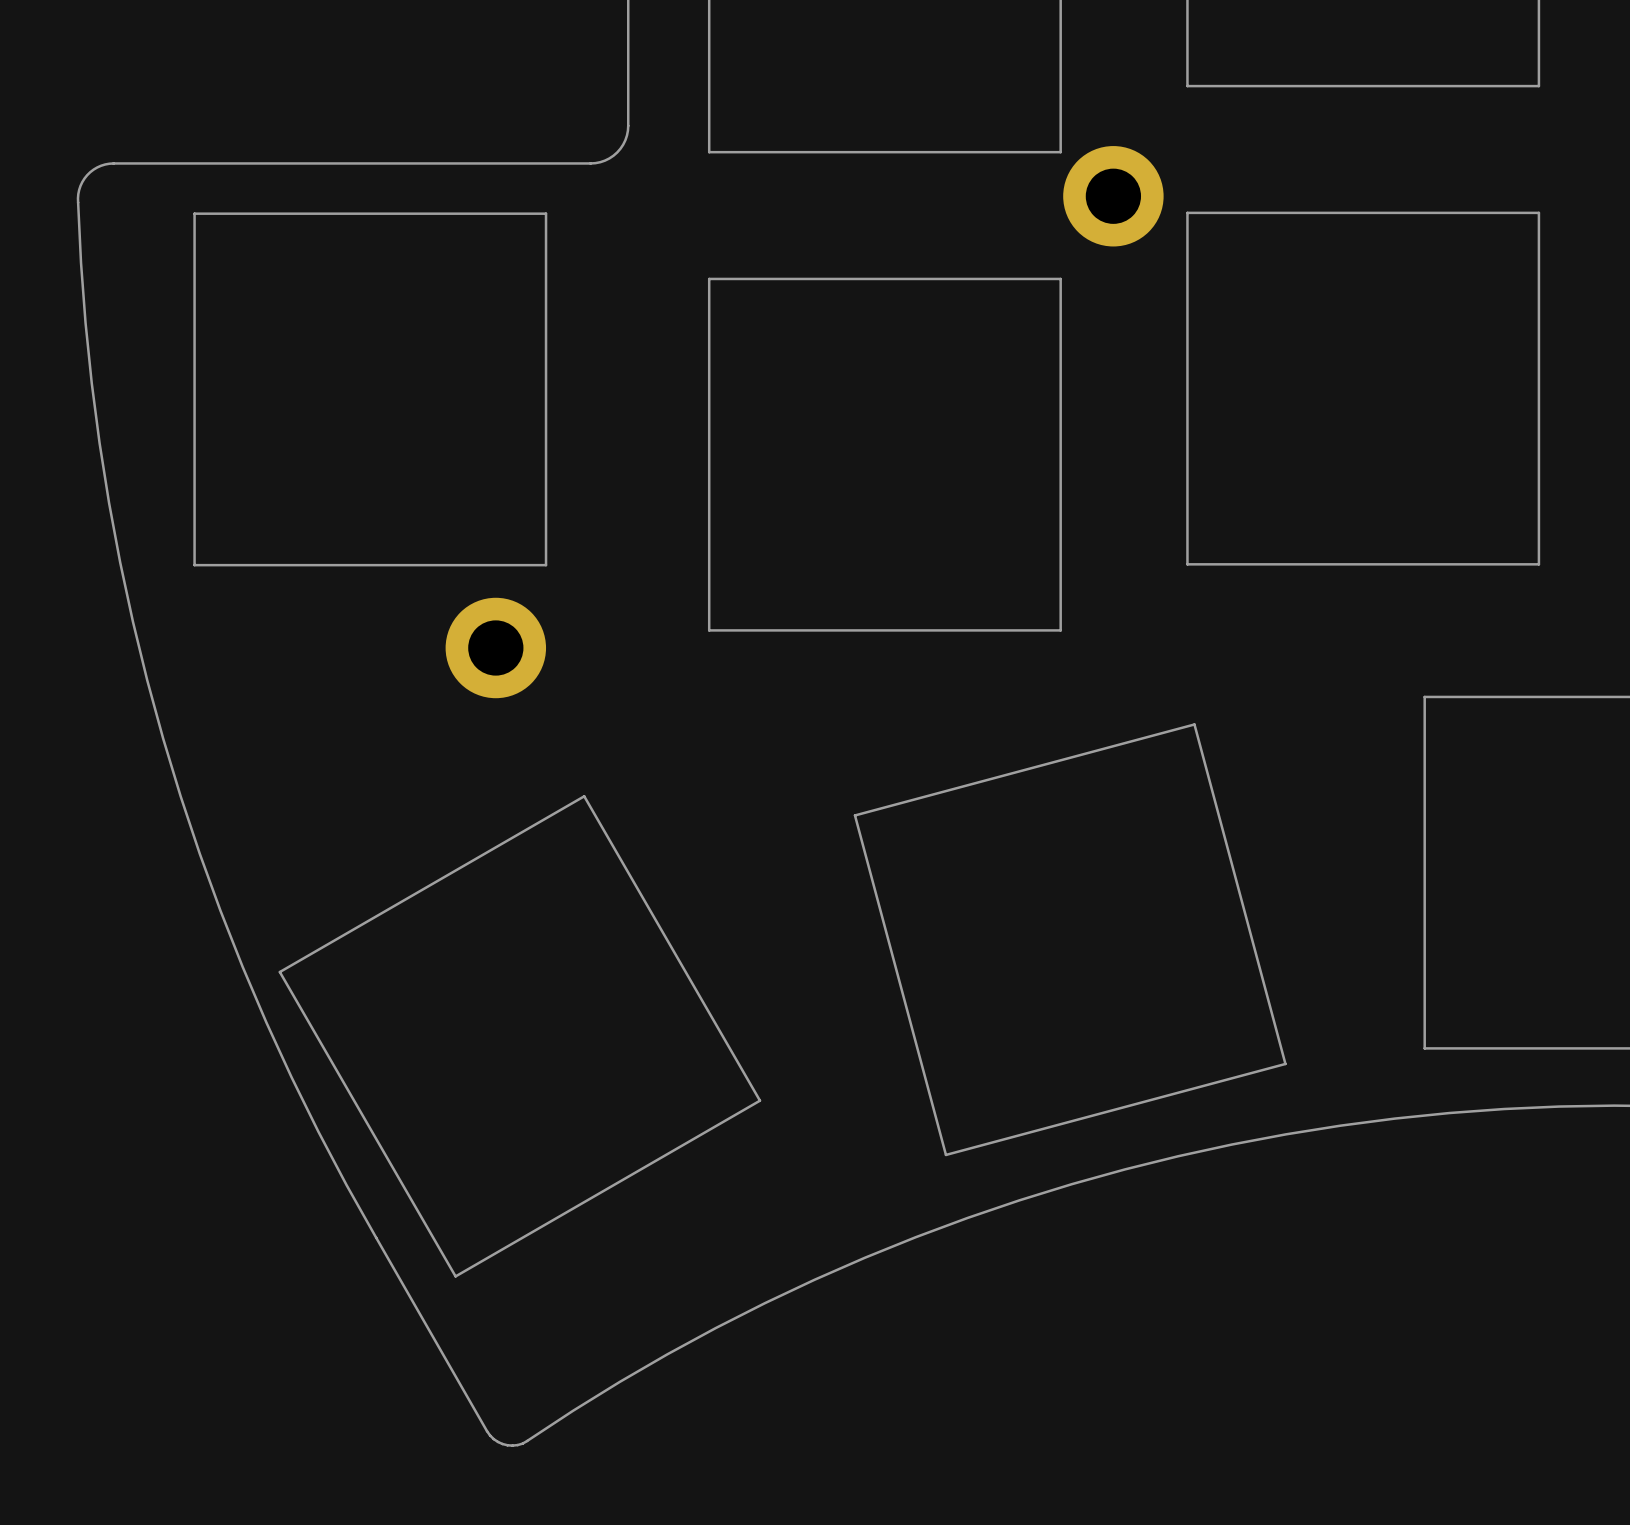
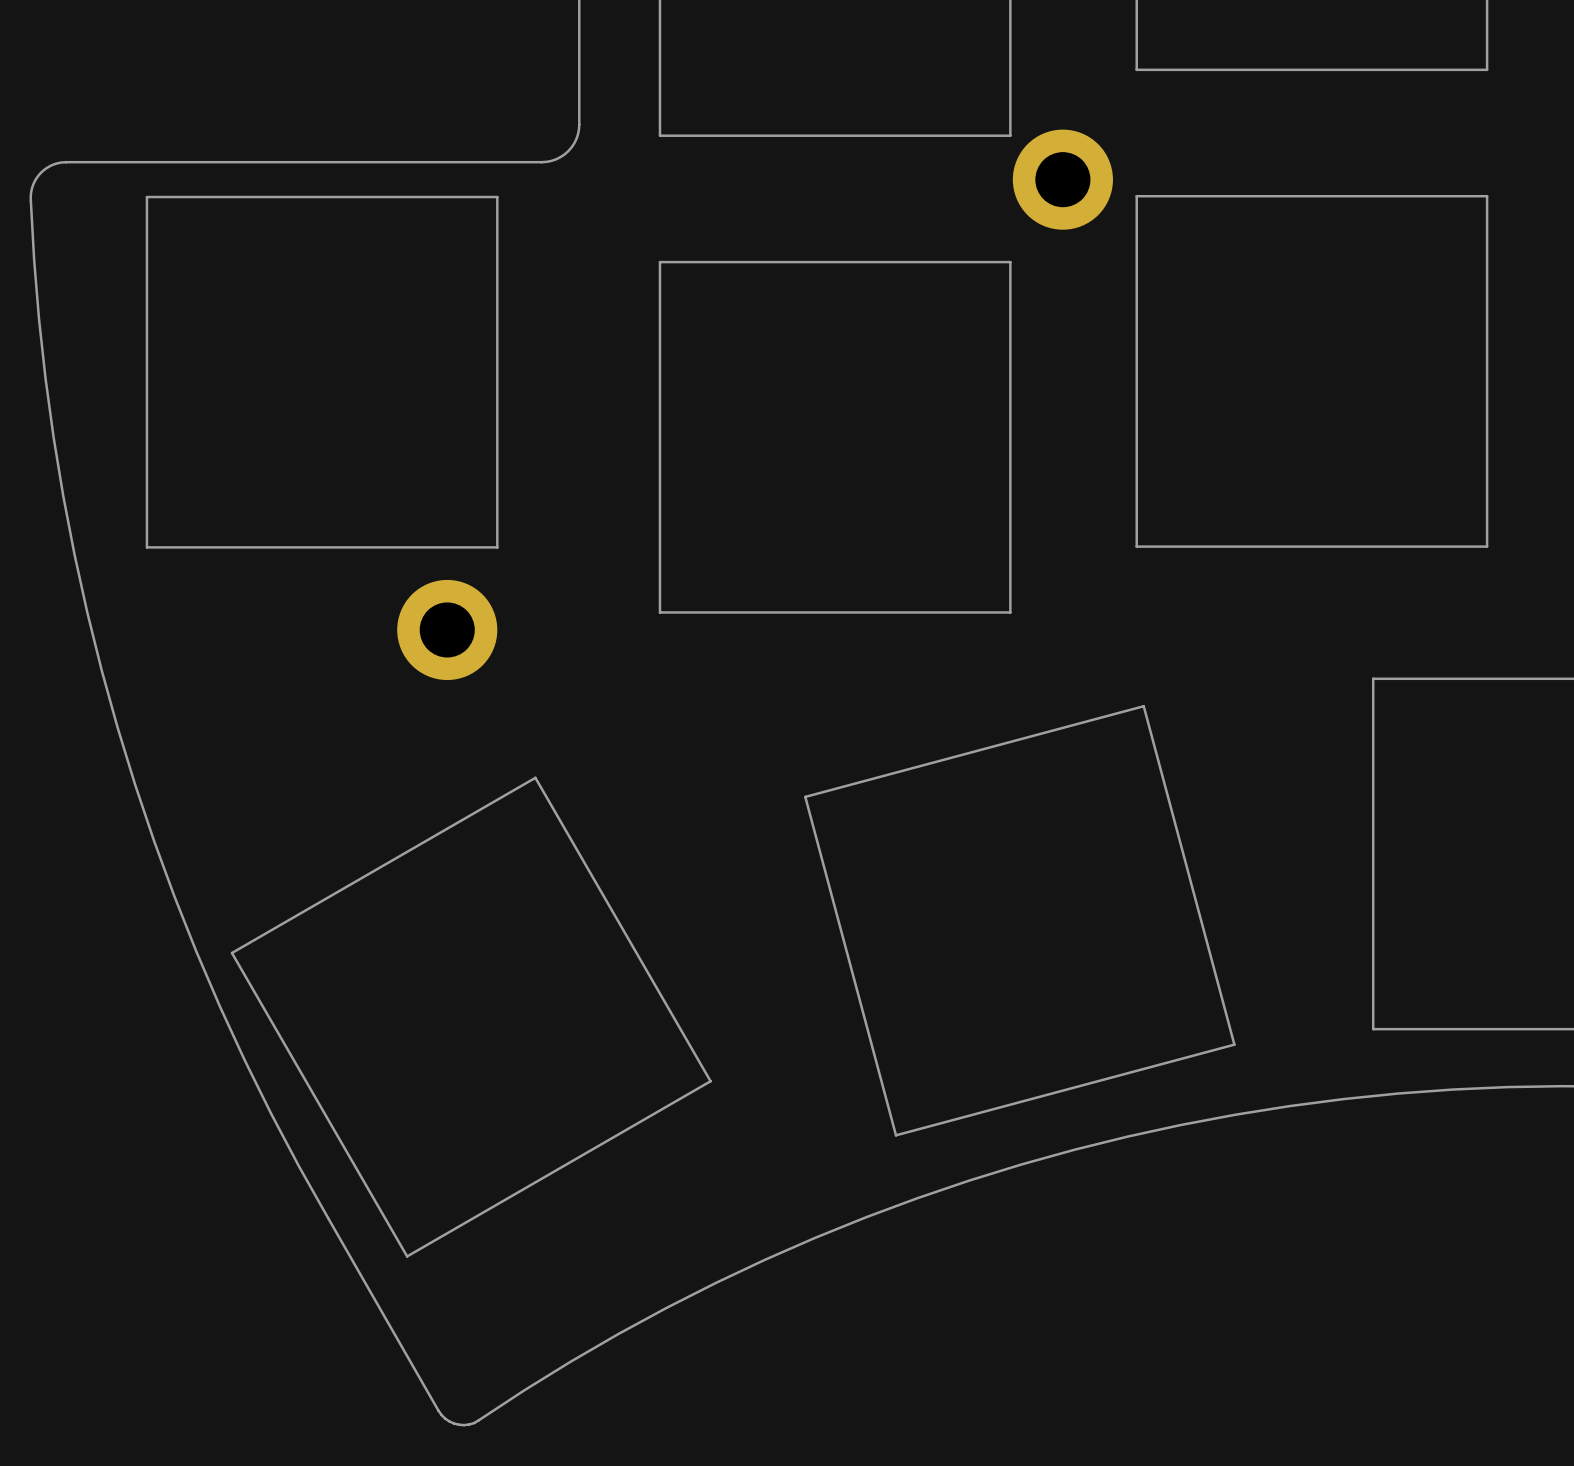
board edge: (628, 125) (625, 140) (617, 152) (605, 160) (595, 163) (113, 163) (101, 165) (90, 172) (82, 182) (79, 189) (78, 202) (85, 323) (99, 443) (120, 562) (147, 680) (163, 738) (199, 853) (220, 910) (266, 1022) (318, 1131) (376, 1237) -> (579, 109) (578, 129) (574, 143) (564, 154) (546, 161) (66, 162) (53, 164) (42, 170) (31, 188) (30, 201) (39, 319) (53, 437) (74, 554) (101, 670) (117, 727) (154, 840) (174, 896) (219, 1006) (271, 1113) (328, 1217)

